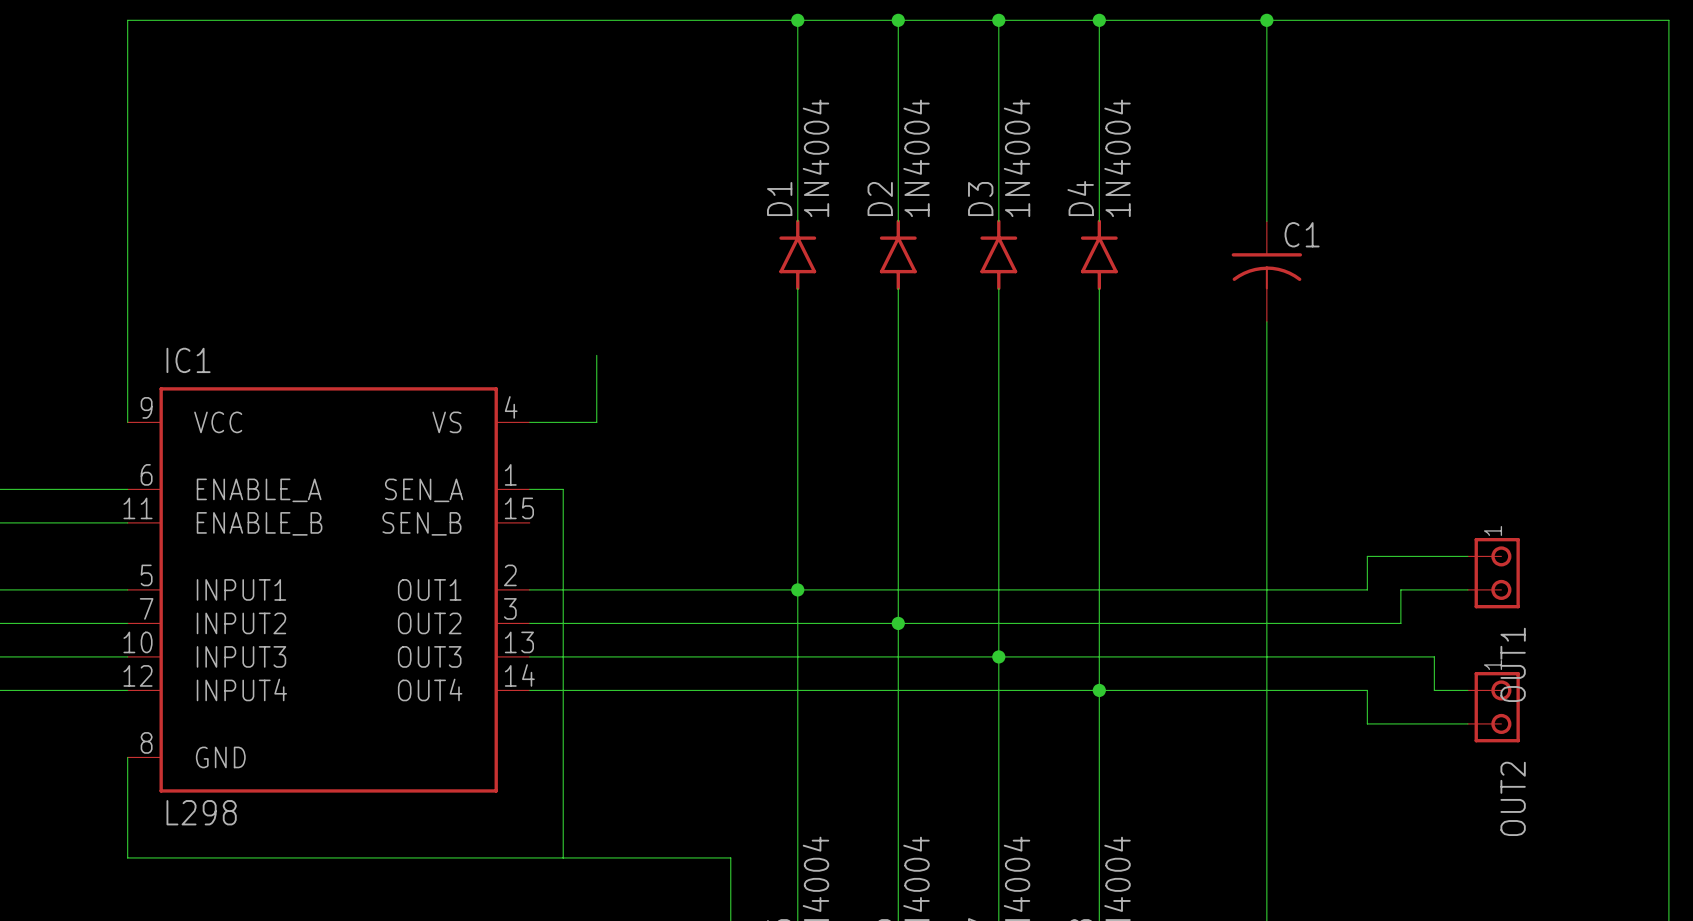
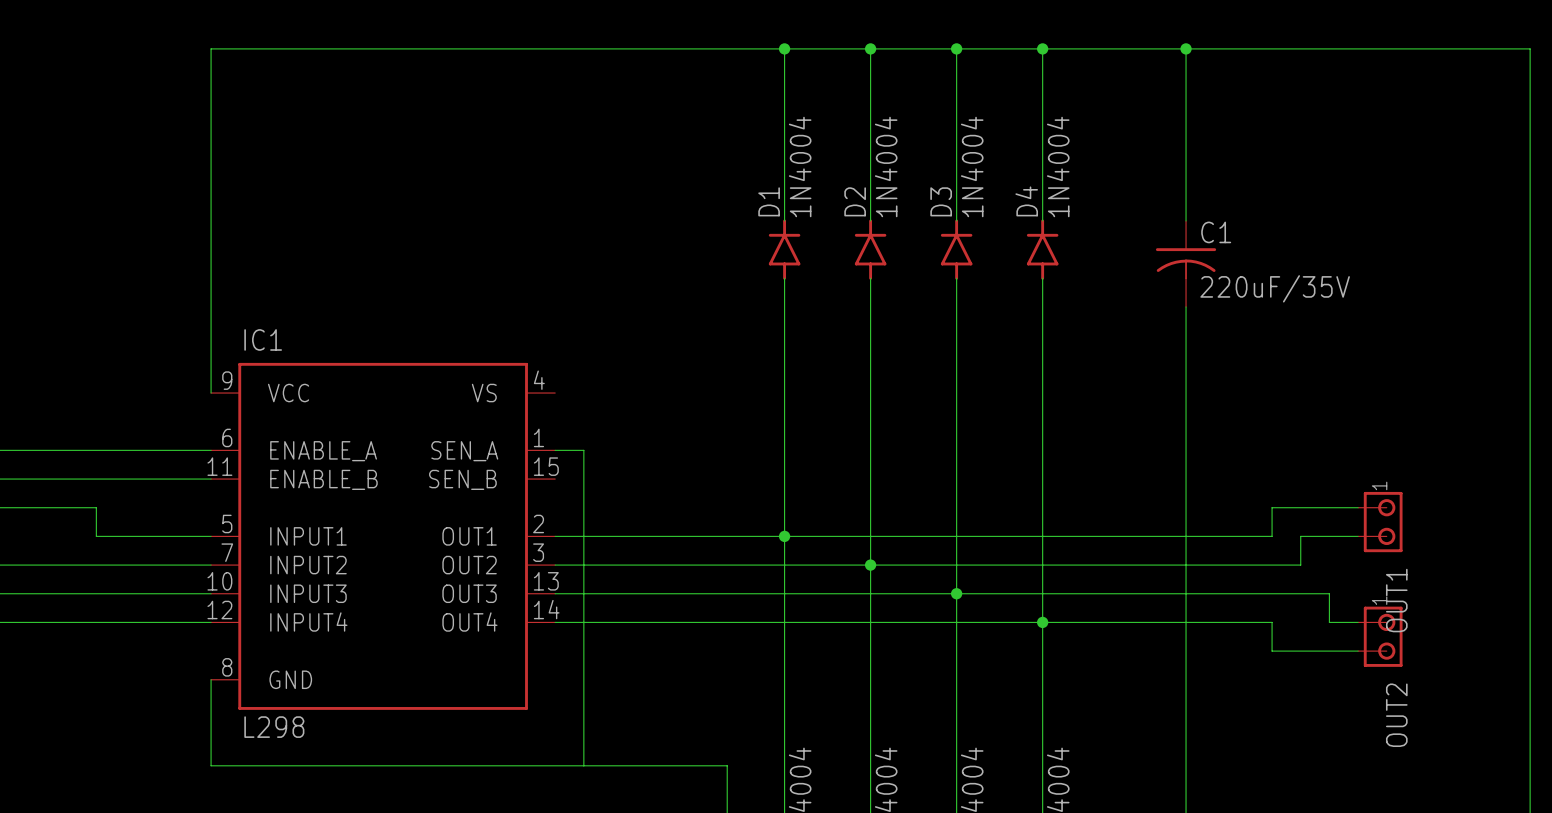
C1 value: none -> 220uF/35V (1275, 288)
wire: (596, 355) (596, 422) (529, 422) -> none

